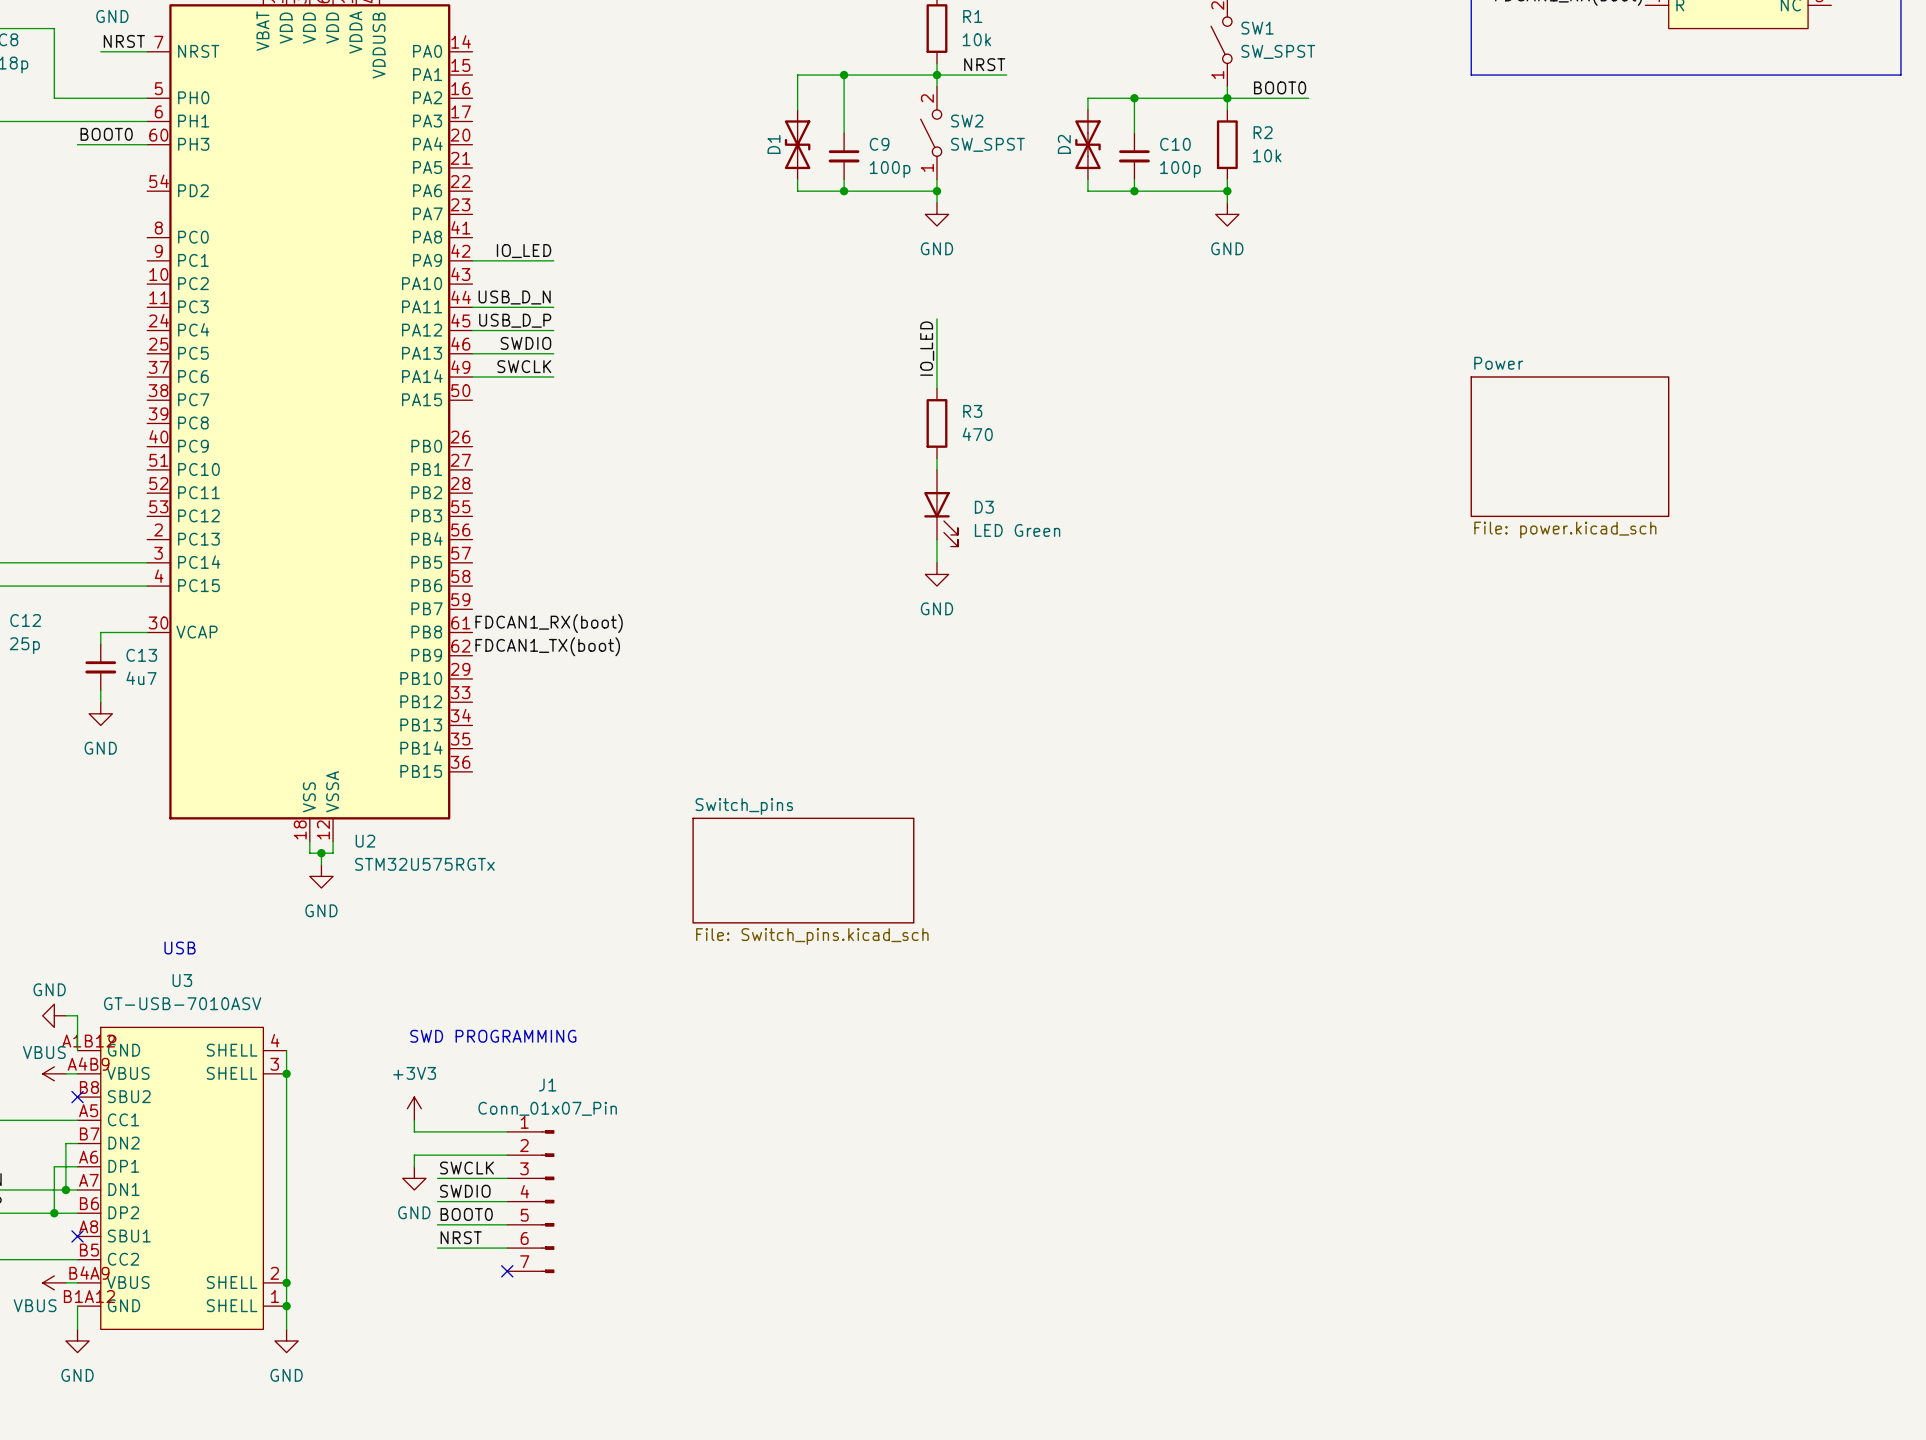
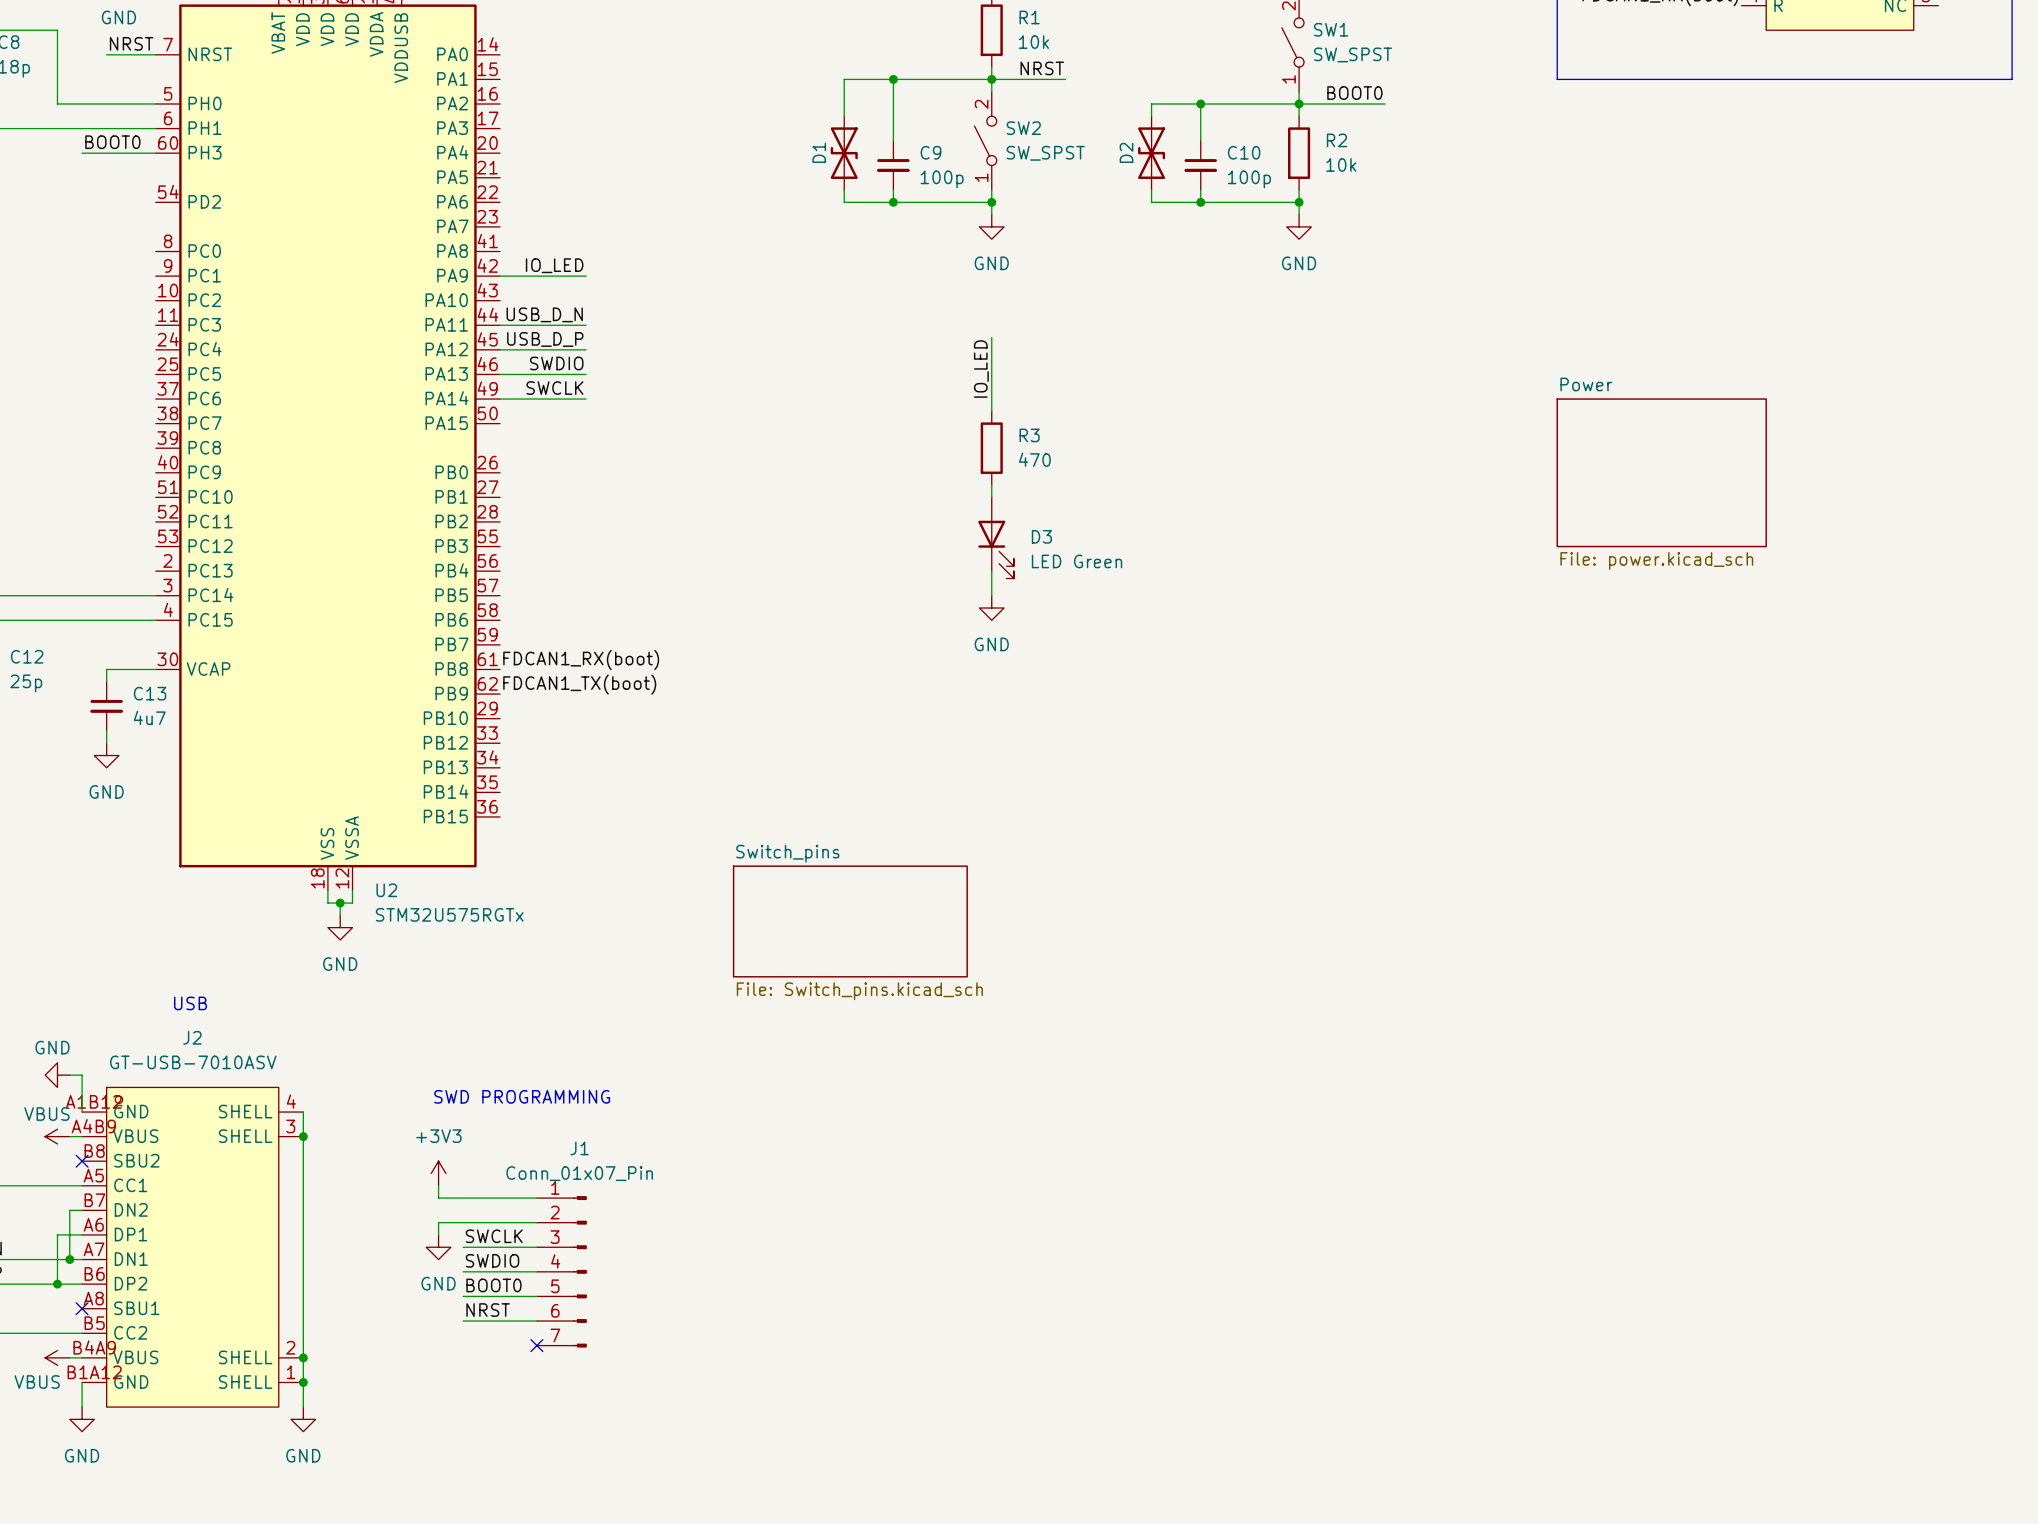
U3 name: U3 (182, 980) -> J2 (192, 1037)

